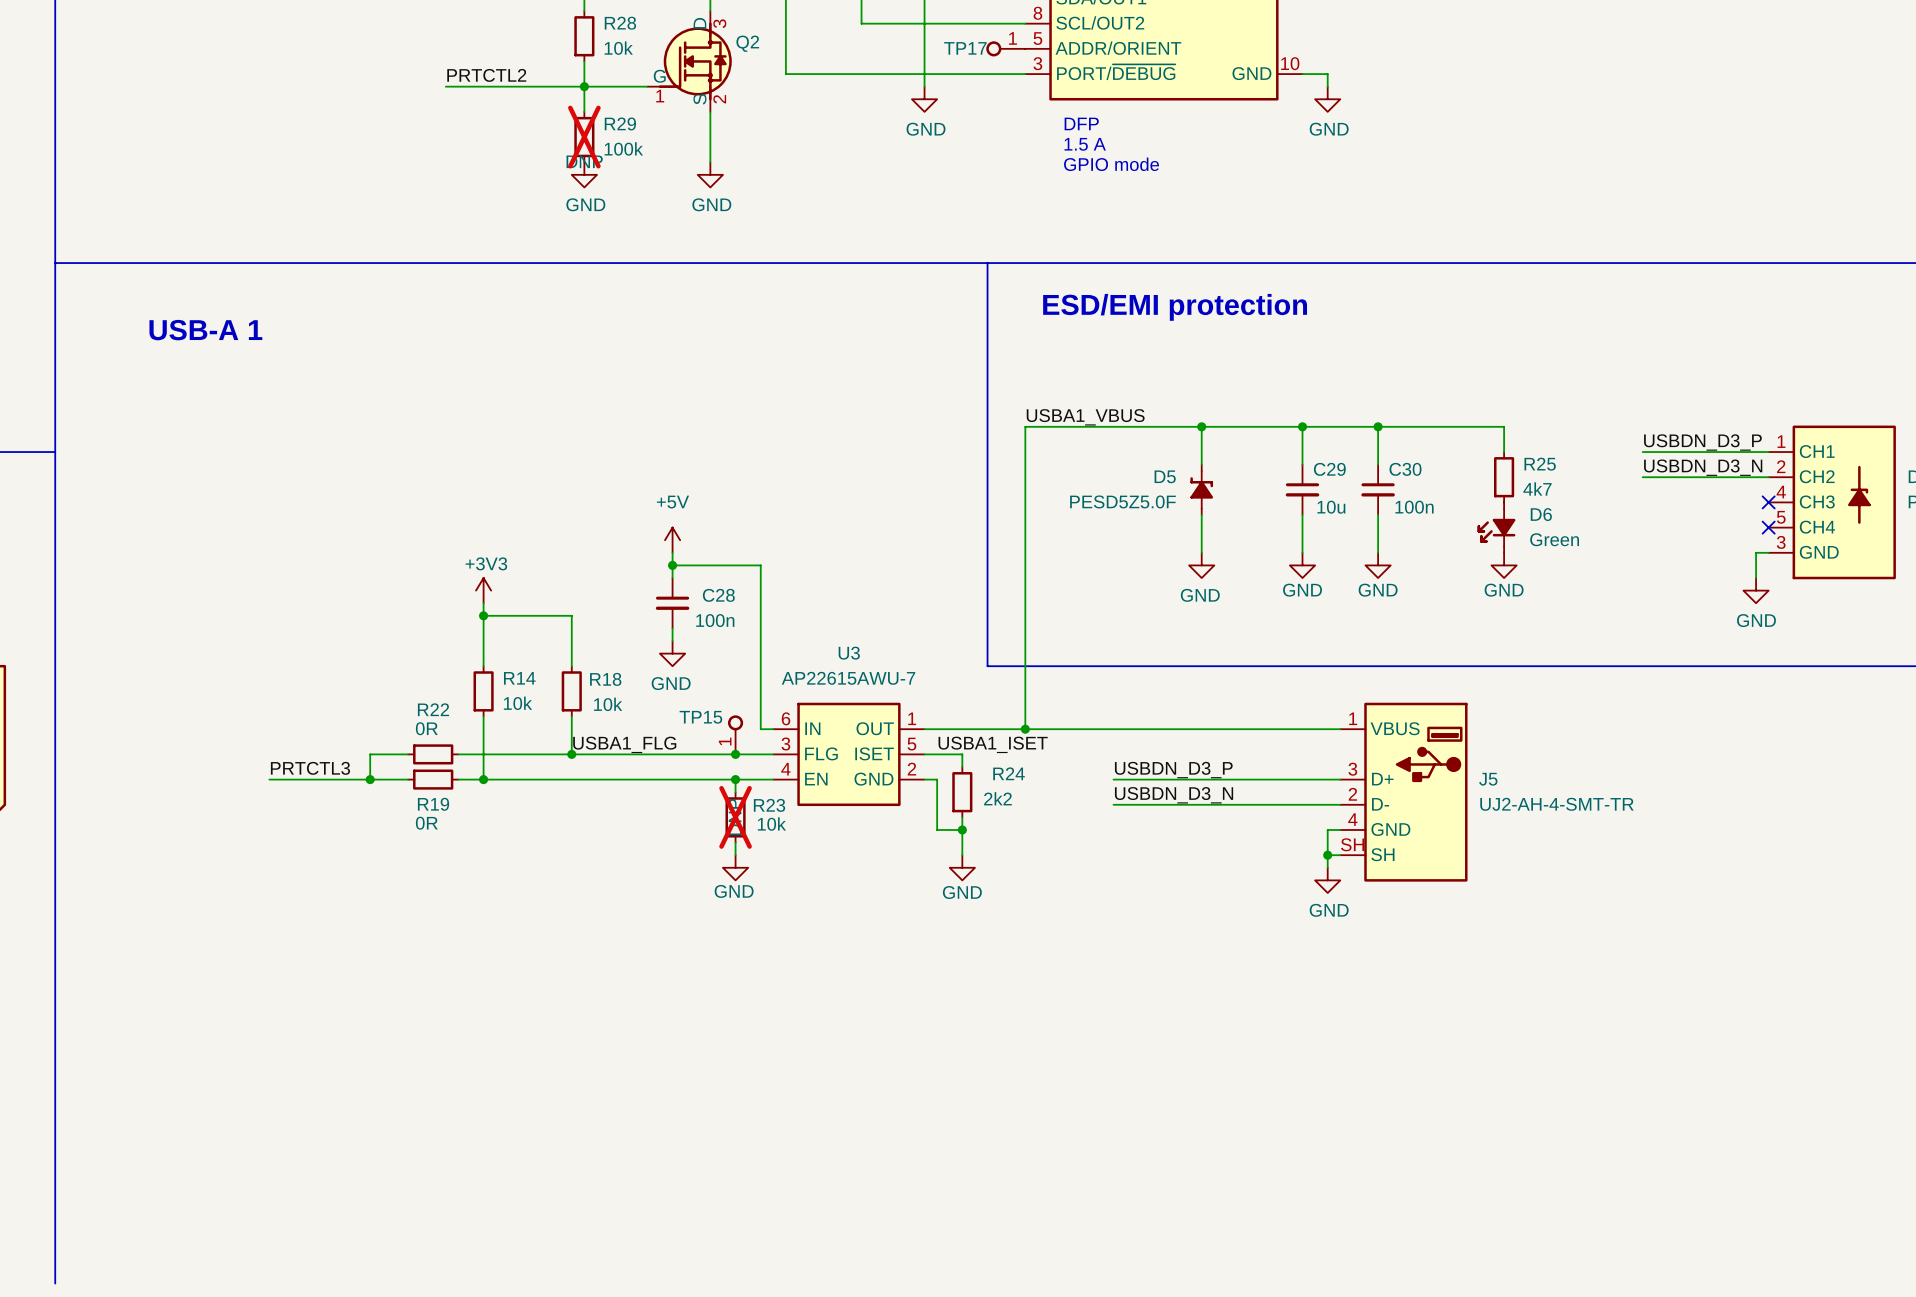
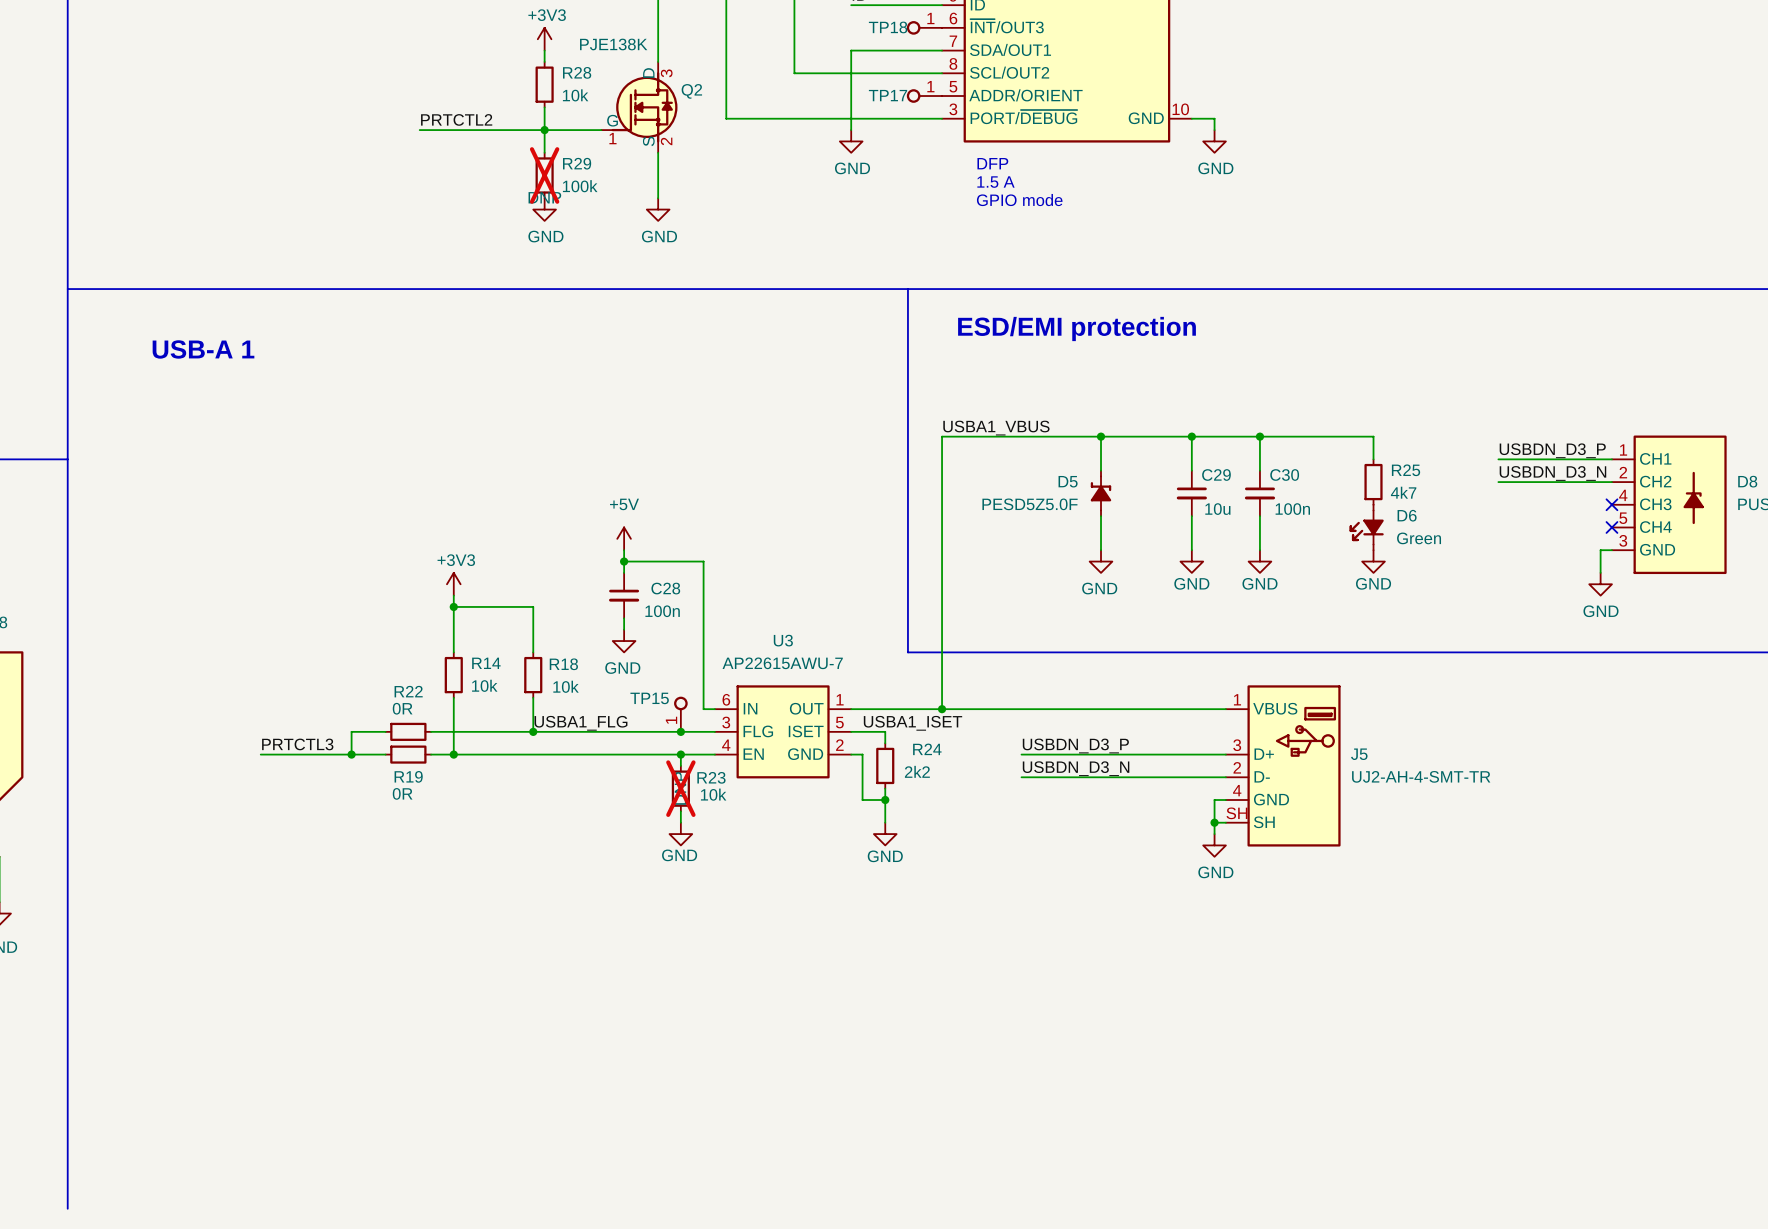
J5 symbol: [1340, 702, 1468, 882] -> [1225, 685, 1341, 847]

